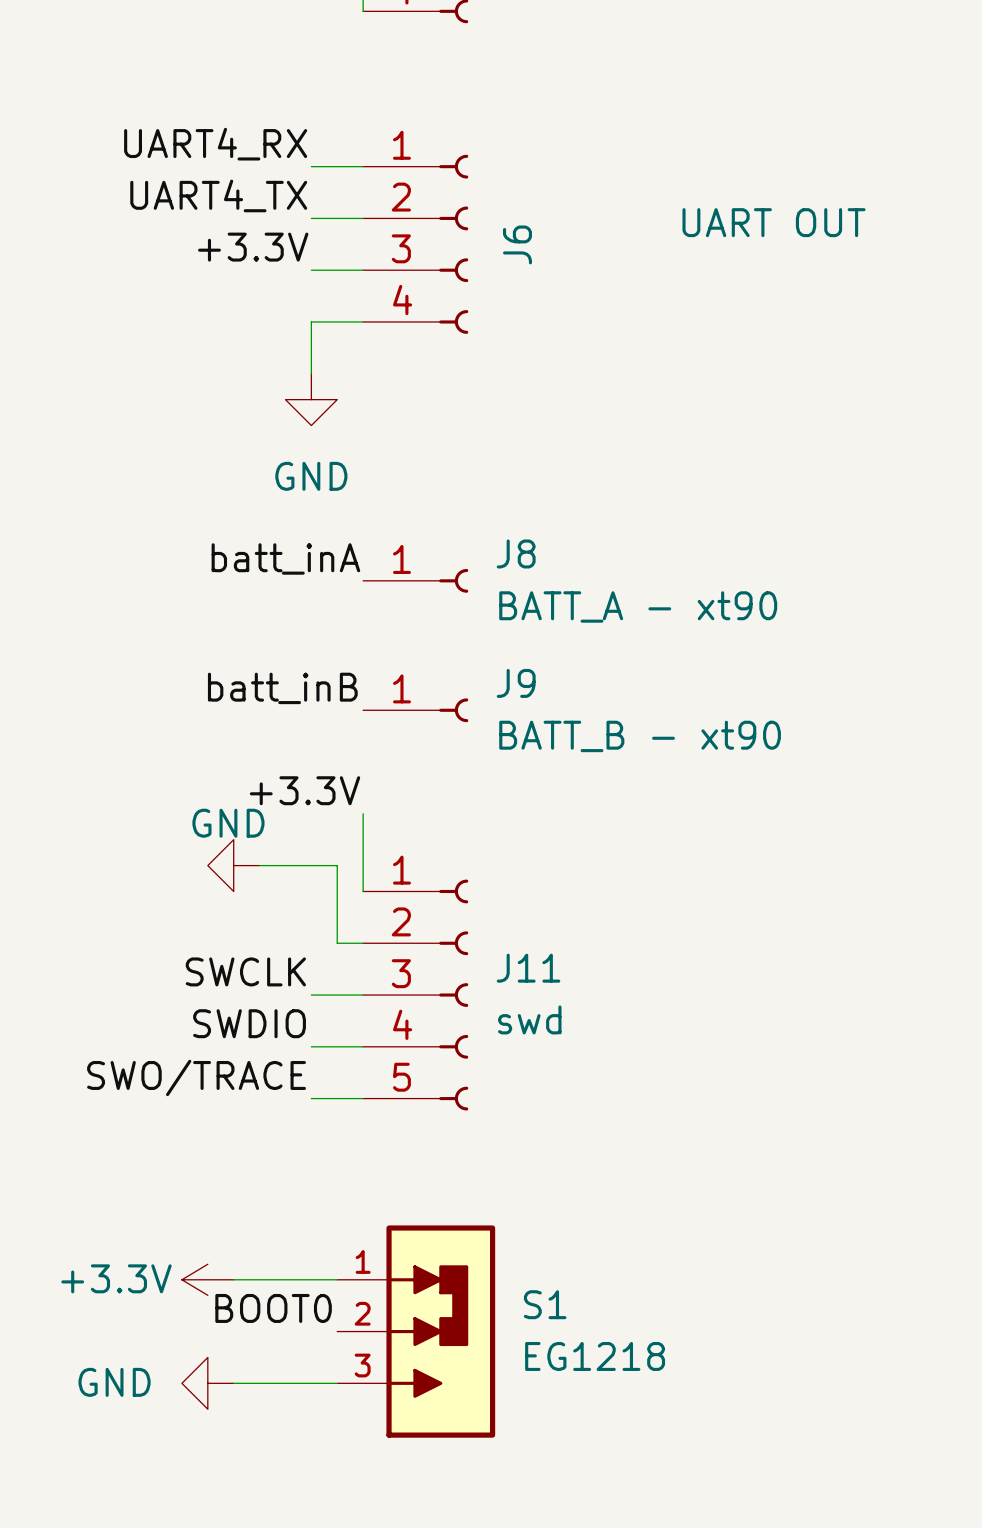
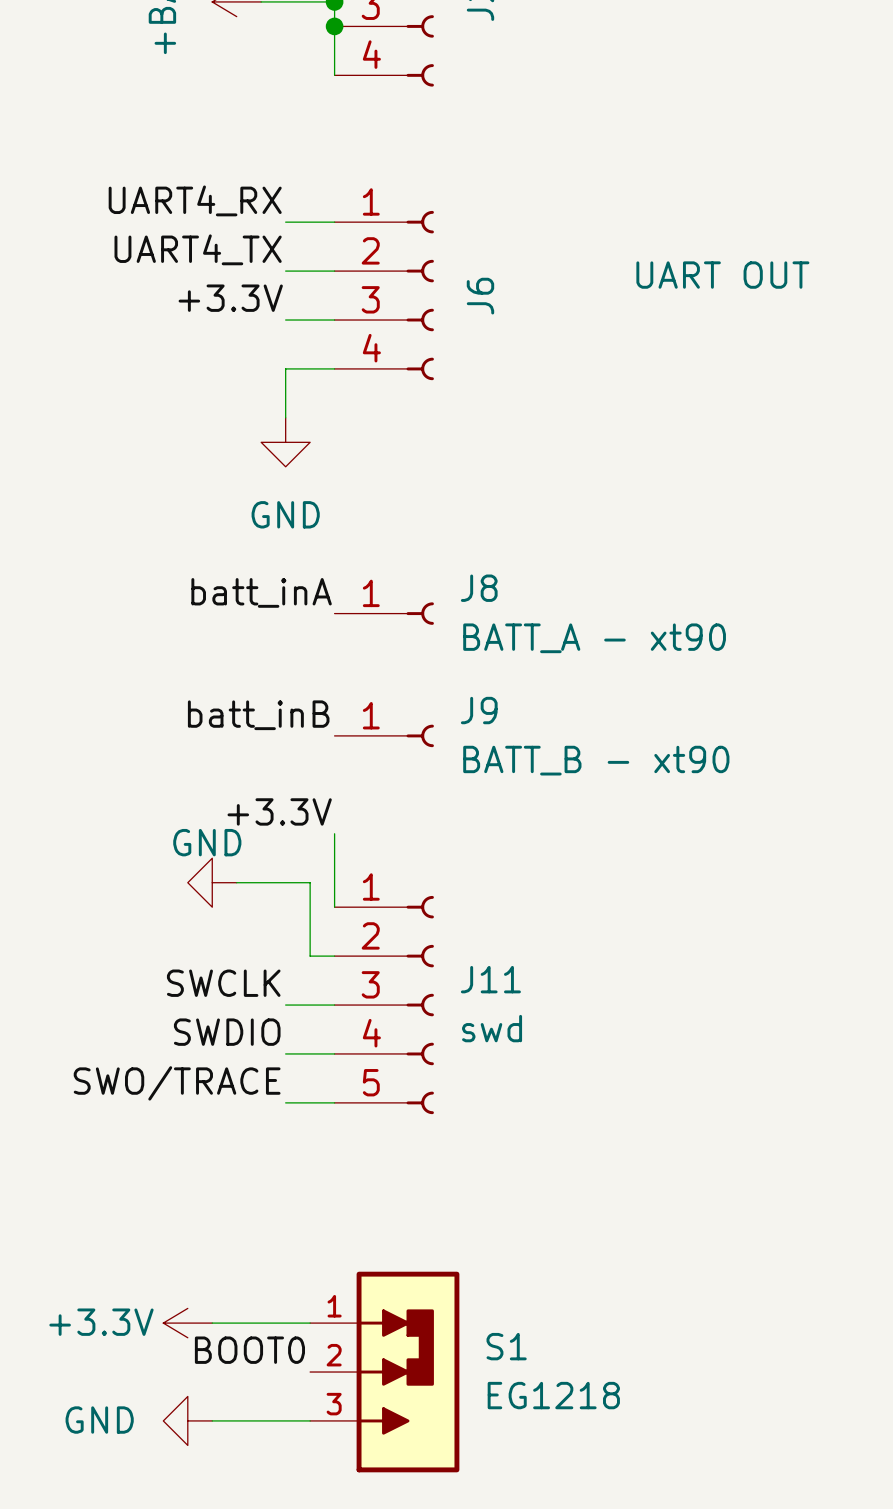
power symbol position: +3.3V (207, 1279) -> +3.3V (187, 1323)
wire: (233, 1279) (337, 1279) -> (212, 1323) (310, 1323)
label position: BOOT0 (273, 1308) -> BOOT0 (249, 1350)
S1 position: (416, 1331) -> (384, 1372)
power symbol position: GND (207, 1383) -> GND (187, 1420)
wire: (233, 1383) (337, 1383) -> (212, 1420) (310, 1420)

